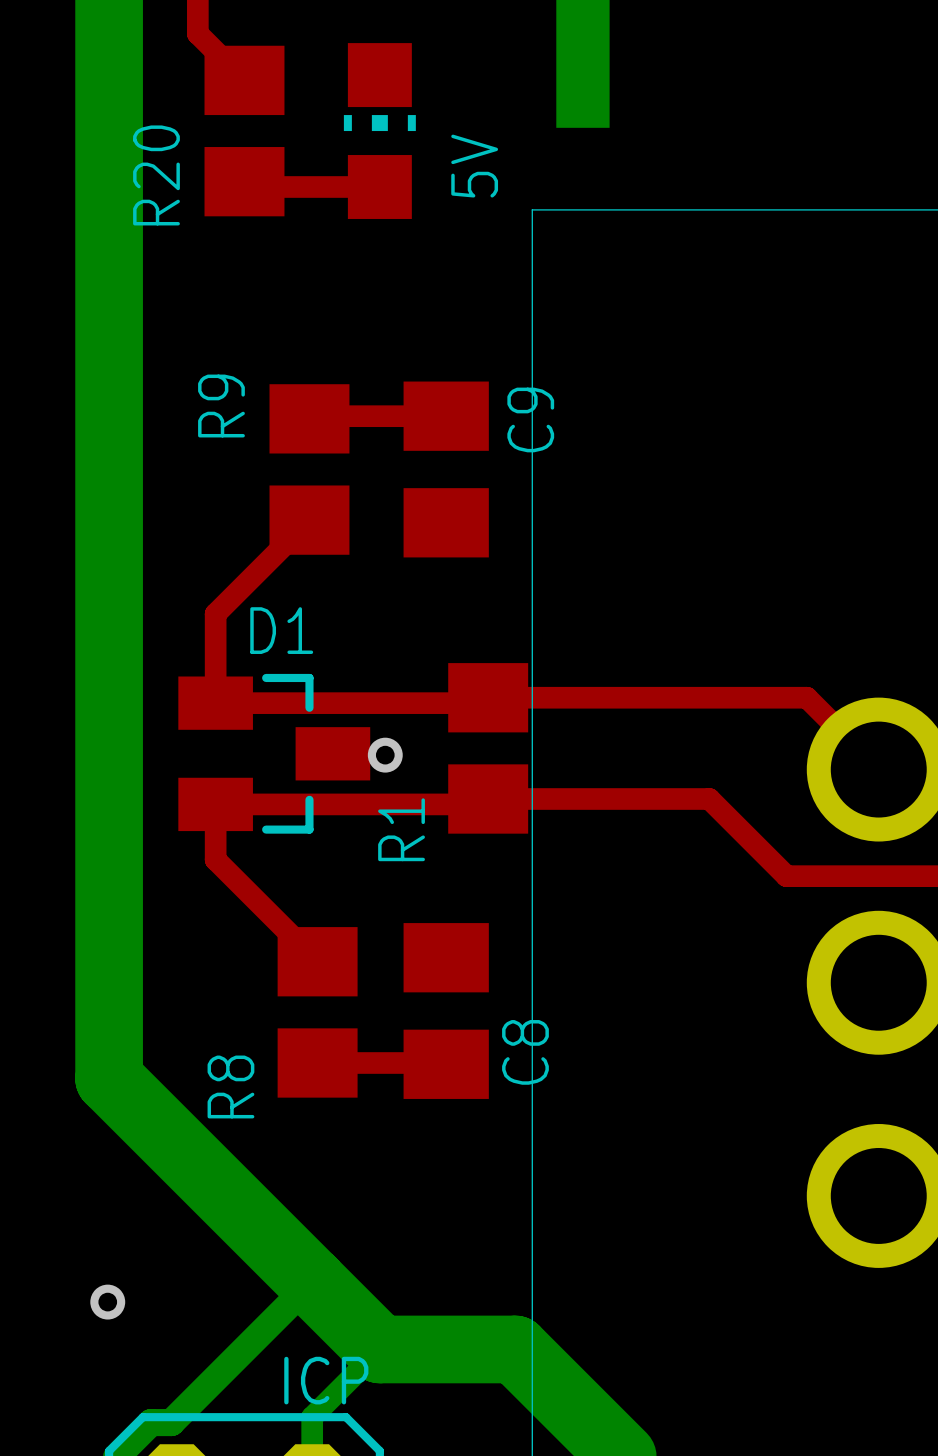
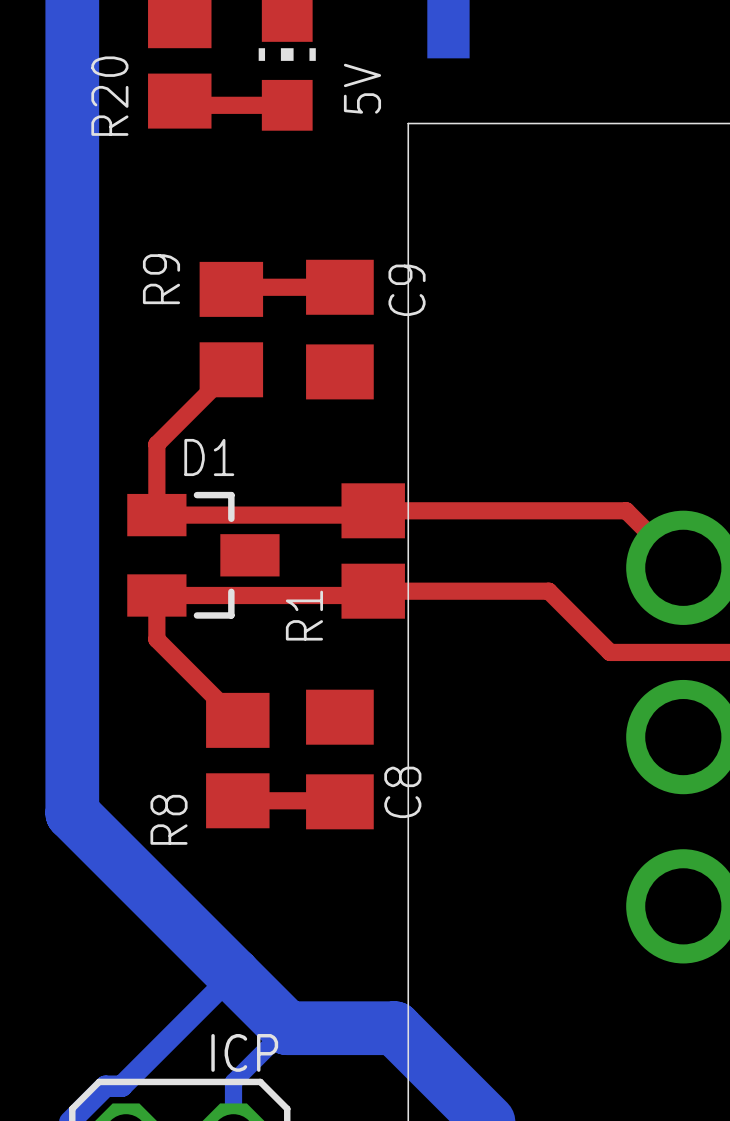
via: (385, 755) -> none
via: (107, 1302) -> none

